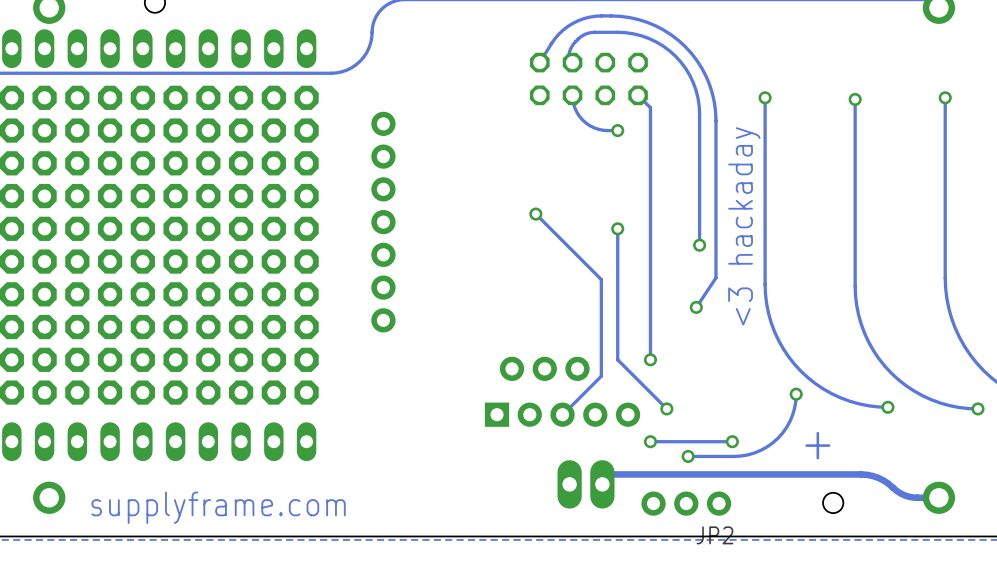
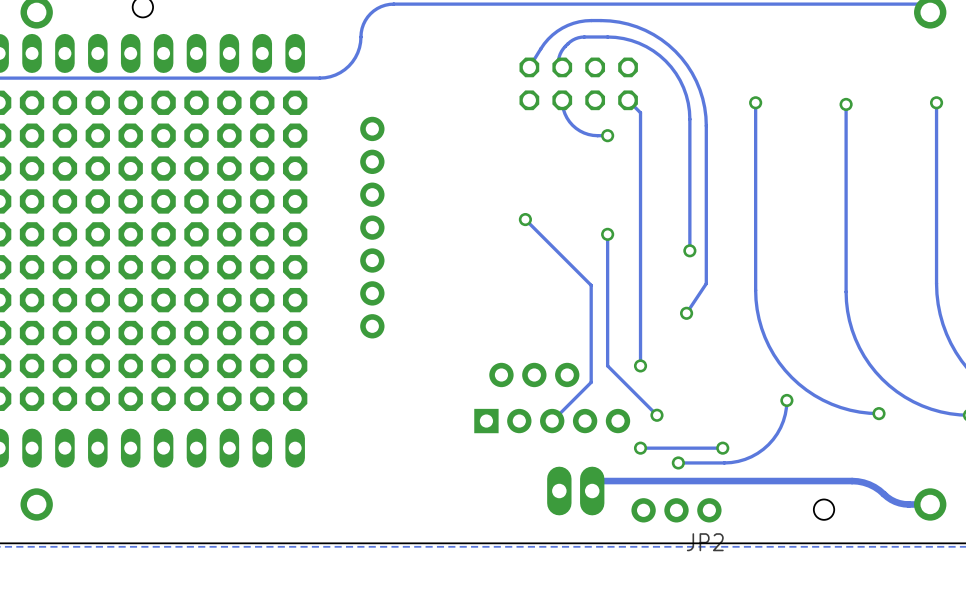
text: <3 hackaday (744, 226) -> none
text: + (817, 445) -> none
text: supplyframe.com (218, 507) -> none

